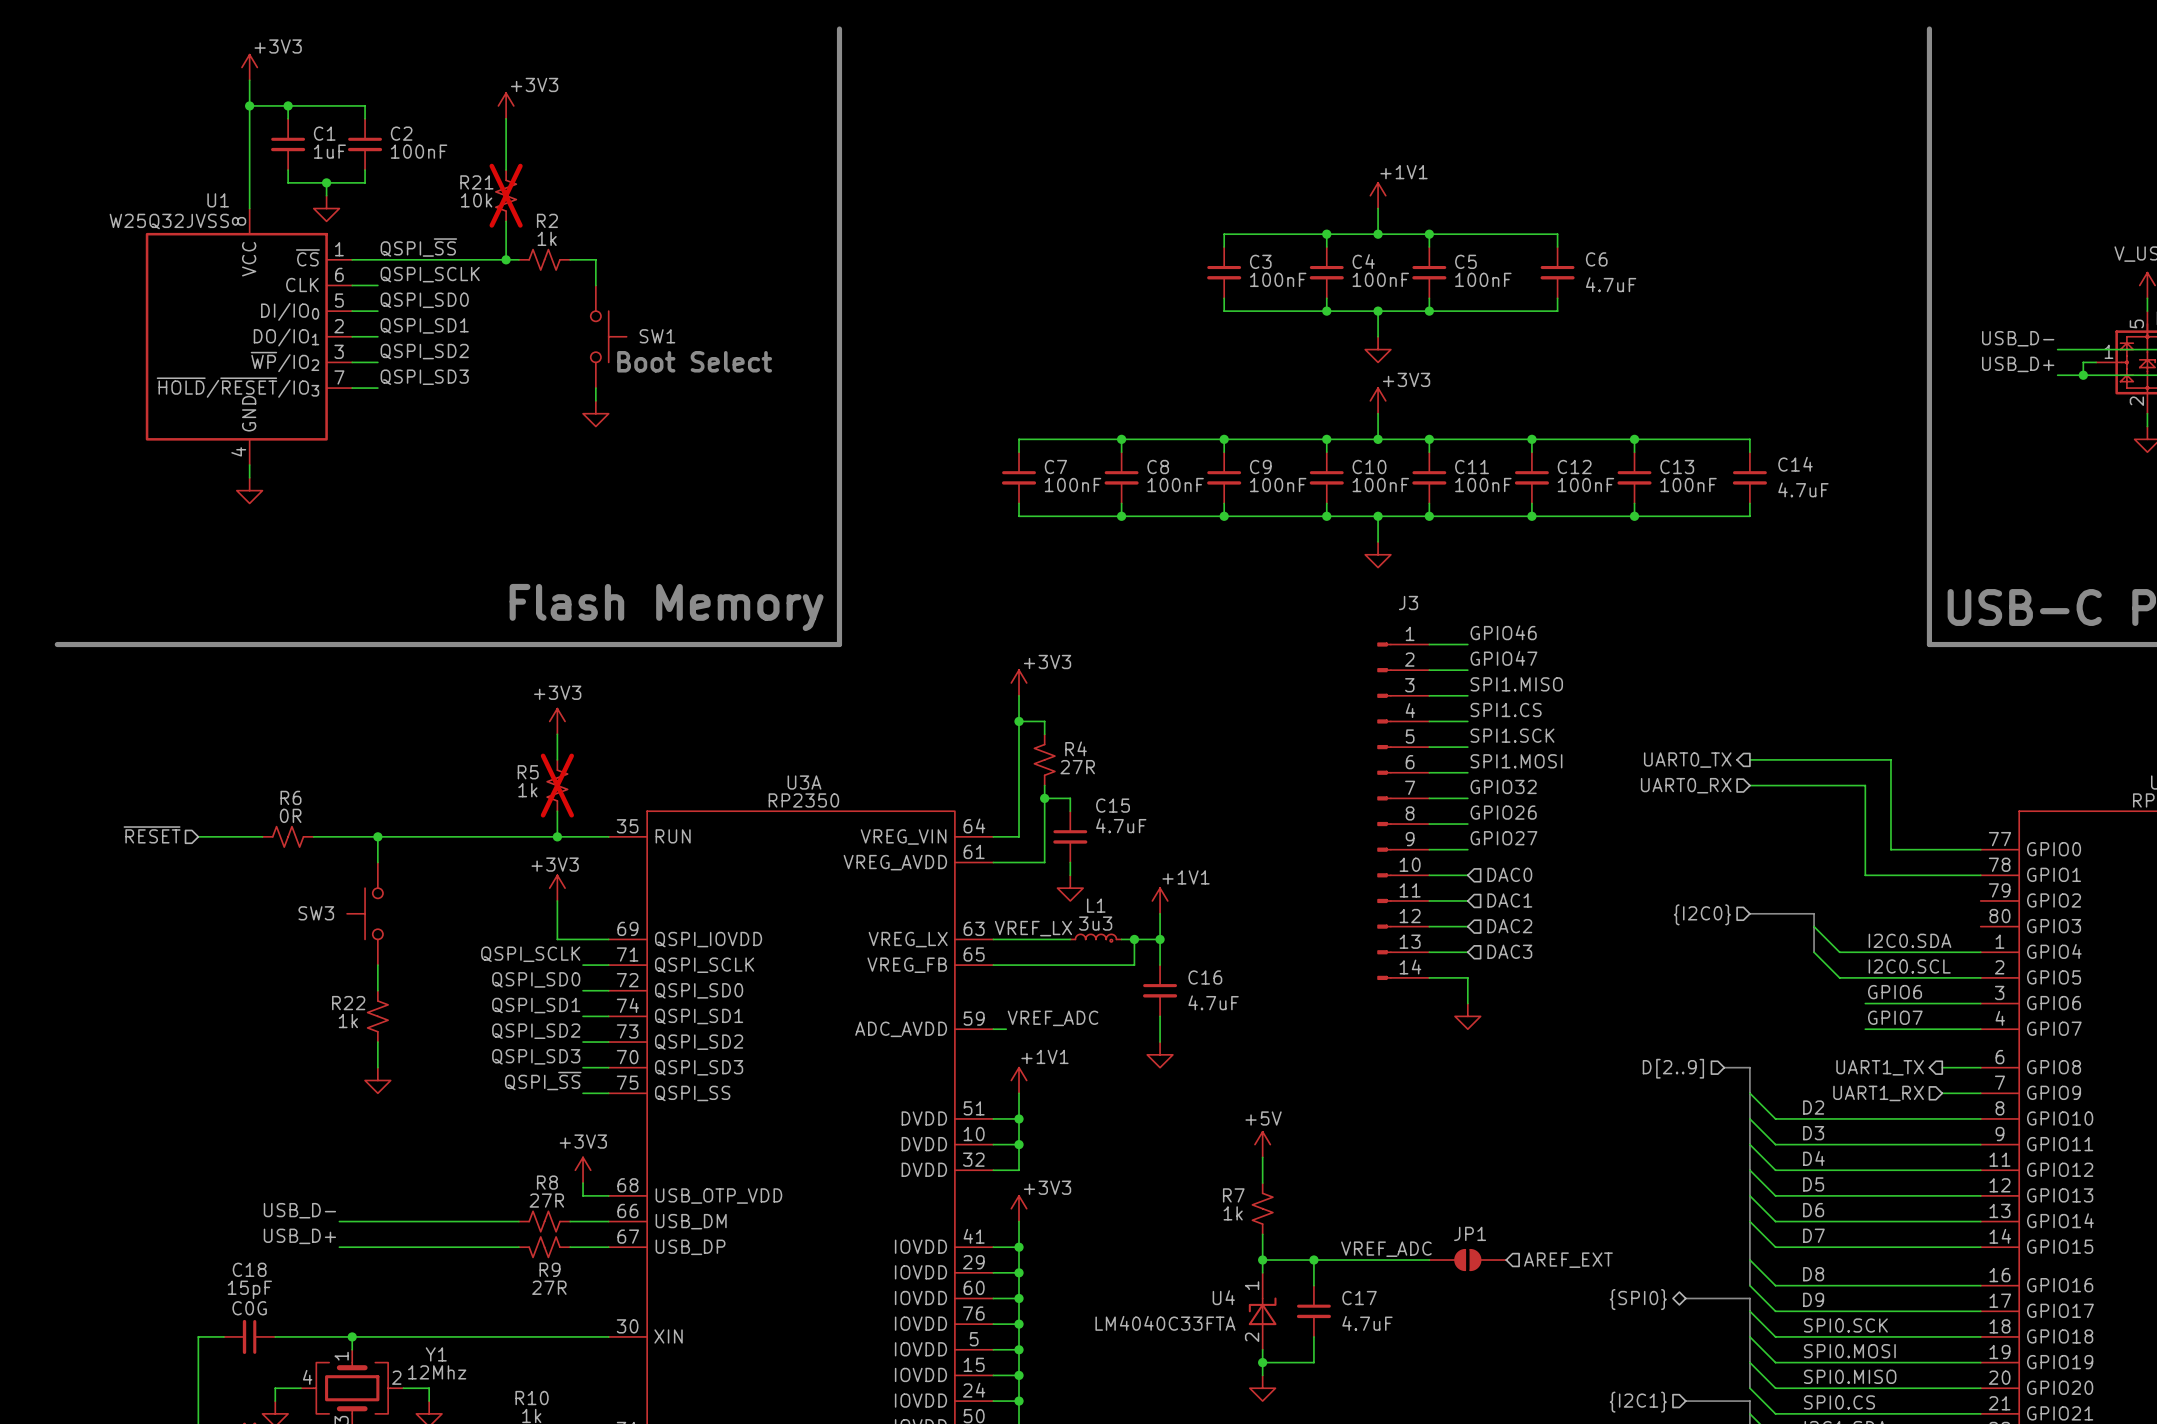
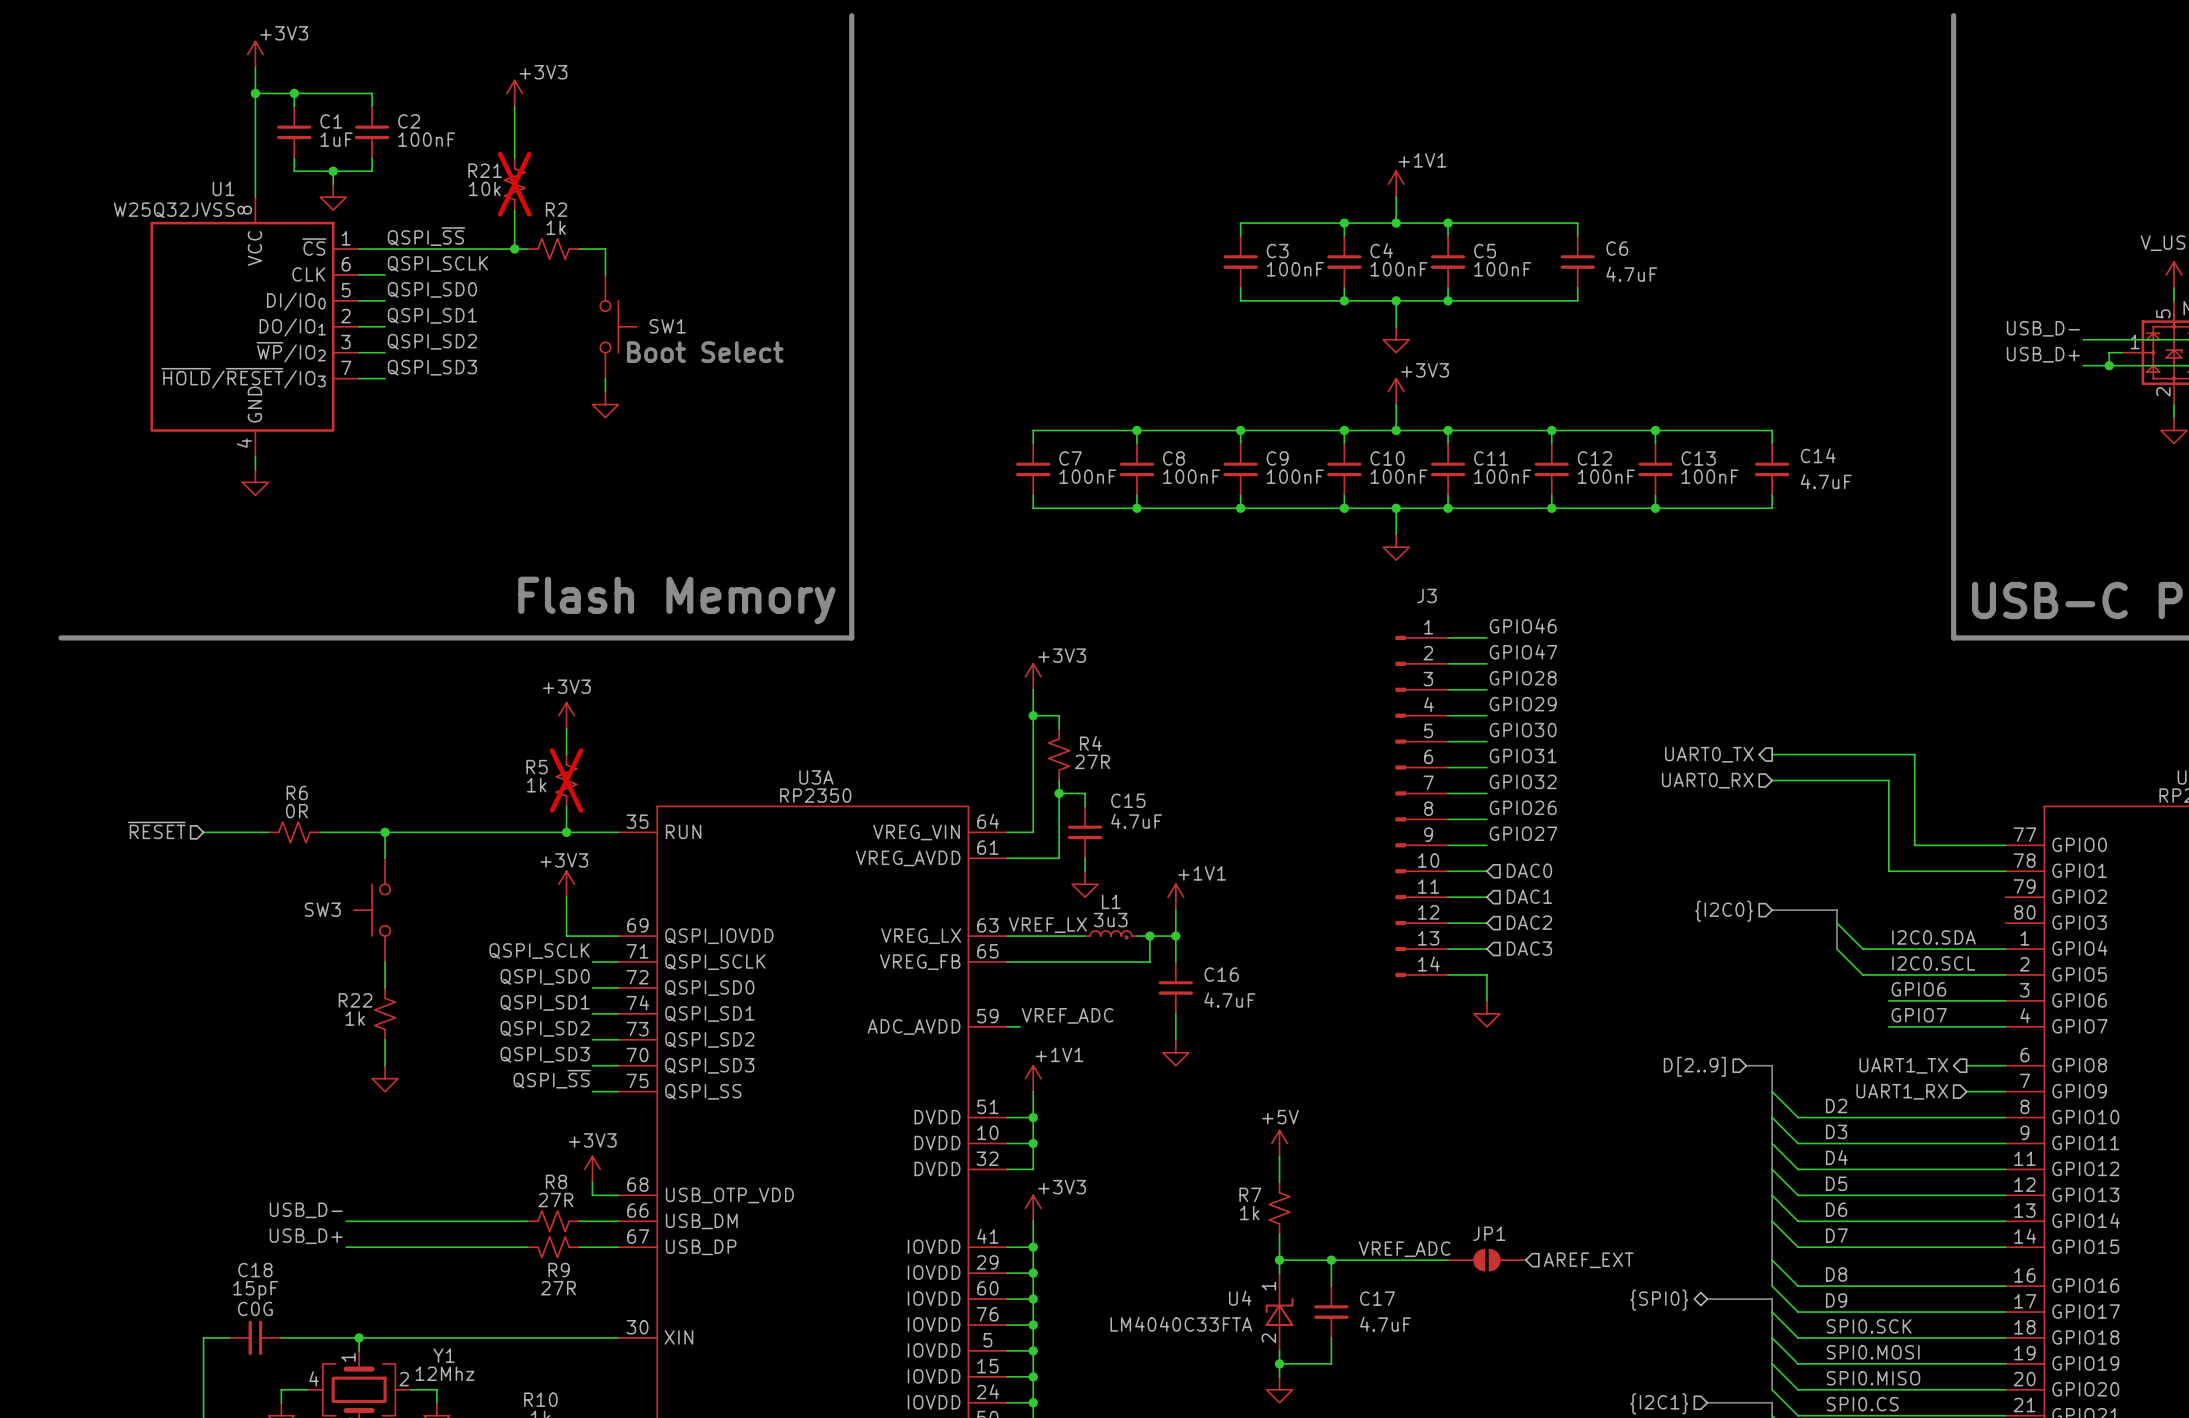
label: SPI1.MISO (1516, 684) -> GPIO28 (1523, 678)
label: SPI1.CS (1506, 710) -> GPIO29 (1523, 704)
label: SPI1.SCK (1512, 735) -> GPIO30 (1523, 730)
label: SPI1.MOSI (1516, 761) -> GPIO31 (1523, 755)

